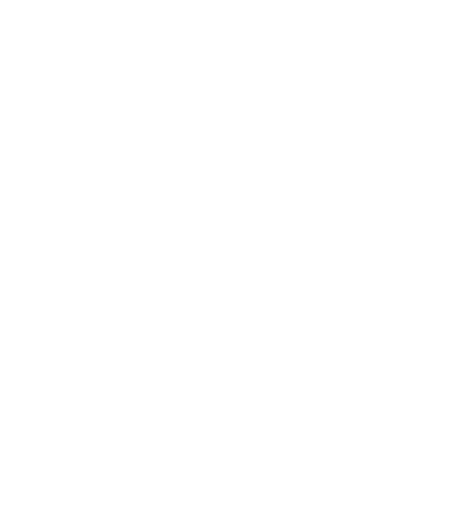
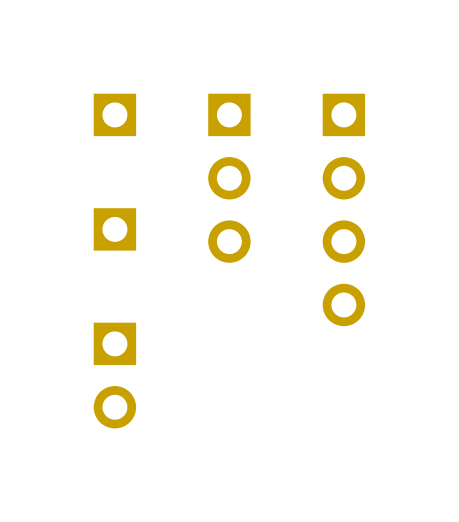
part: none -> (114, 114)
part: none -> (229, 178)
part: none -> (343, 209)
part: none -> (114, 229)
part: none -> (114, 375)

